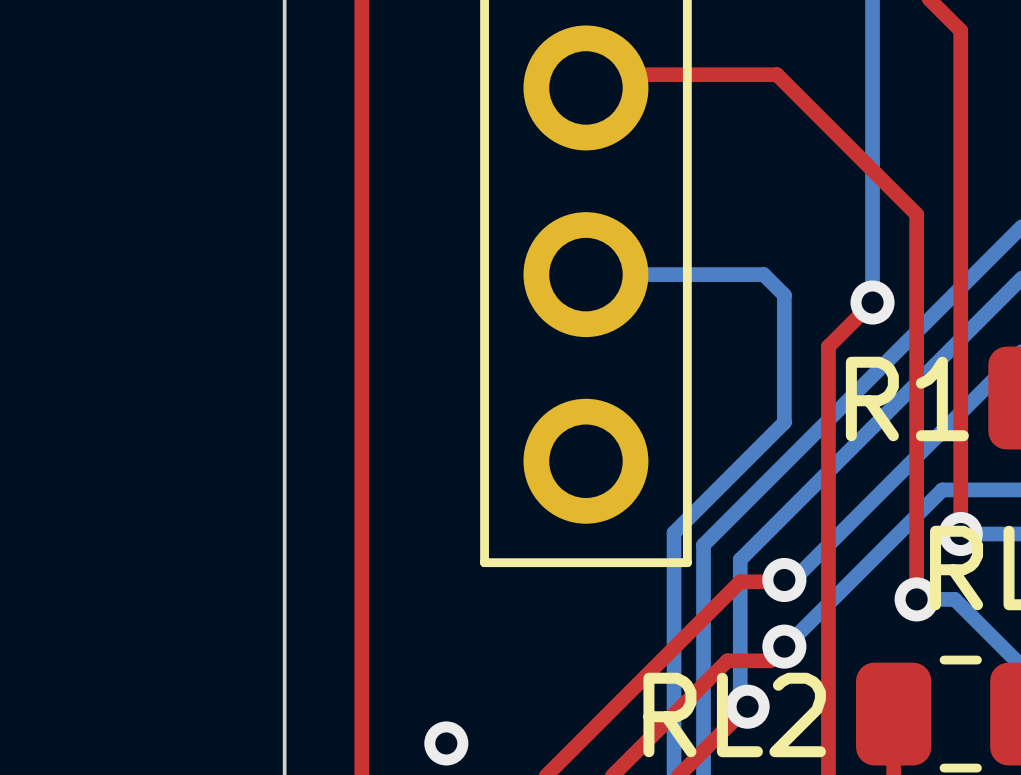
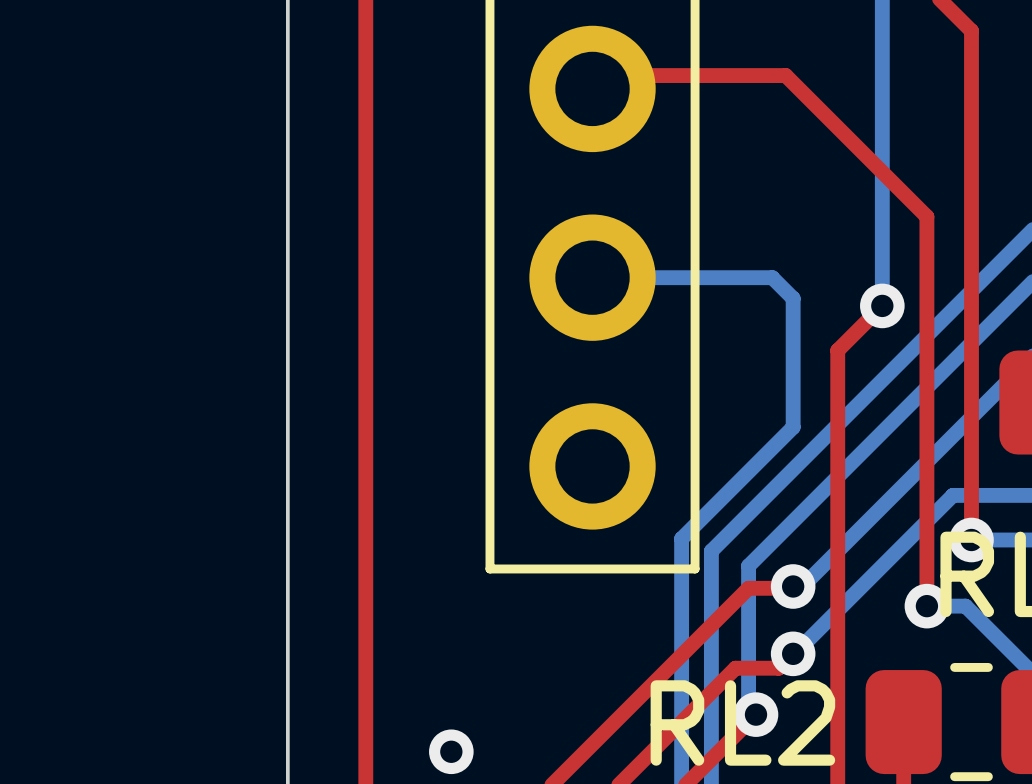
R1 name: R1 (907, 398) -> none

